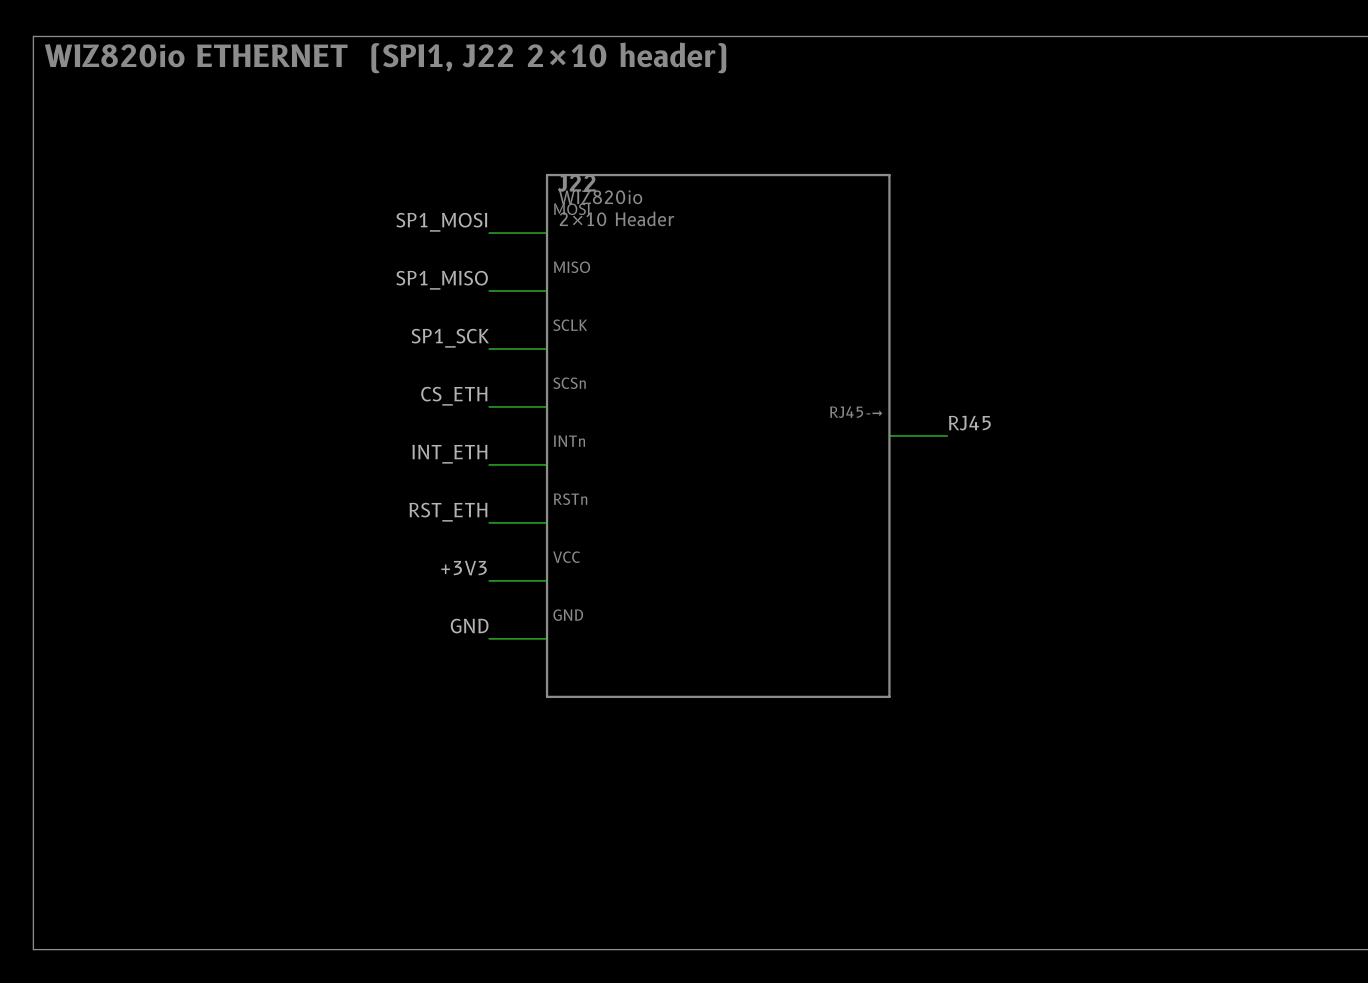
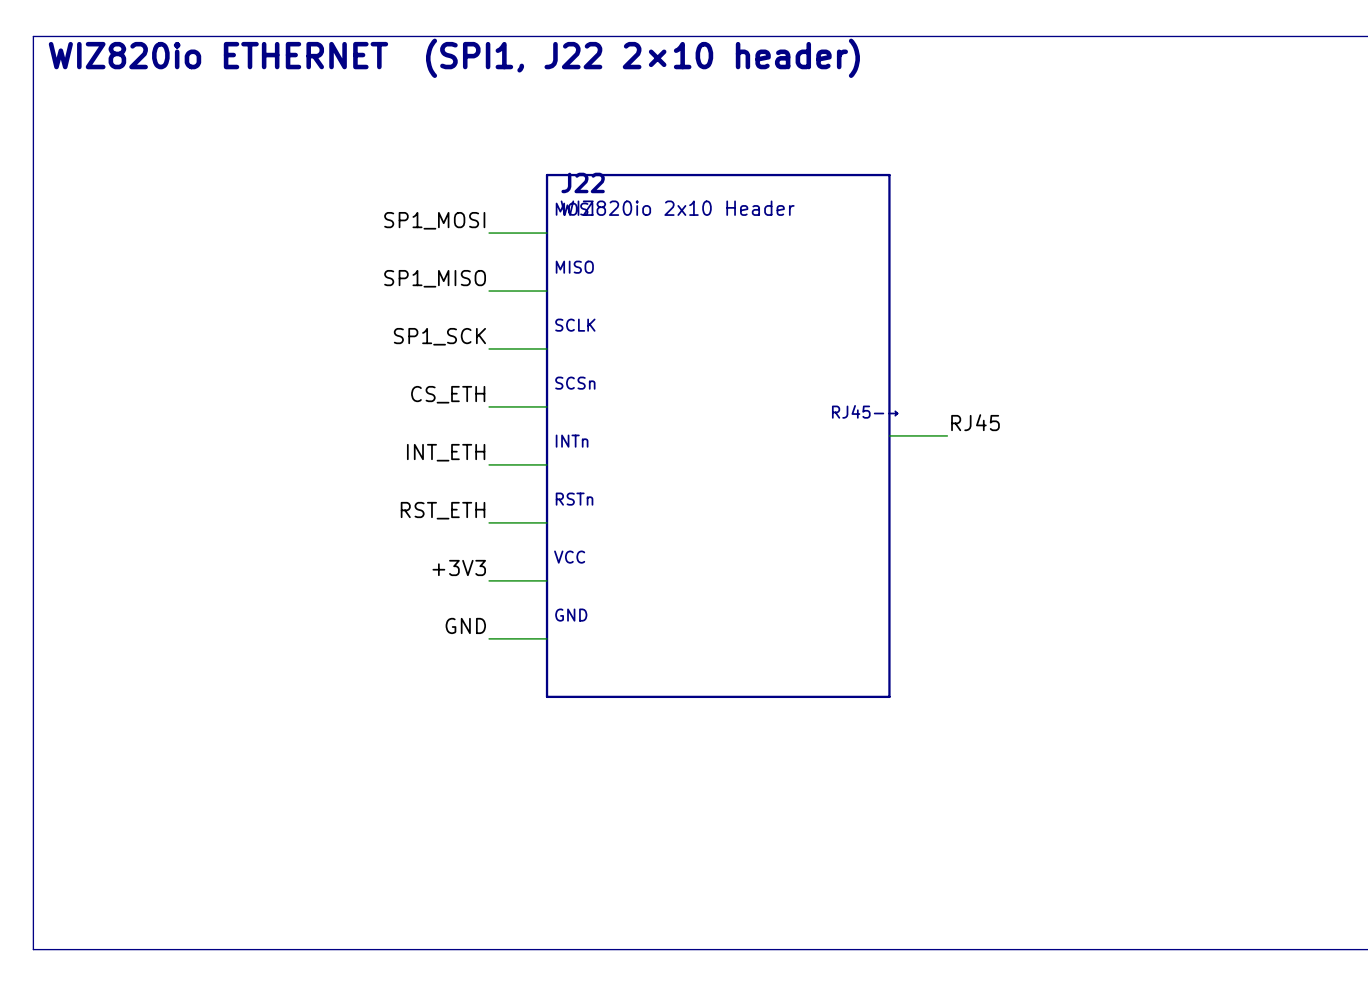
text: WIZ820io (600, 197) -> none
text: 2×10 Header (617, 218) -> WIZ820io 2x10 Header (677, 208)

